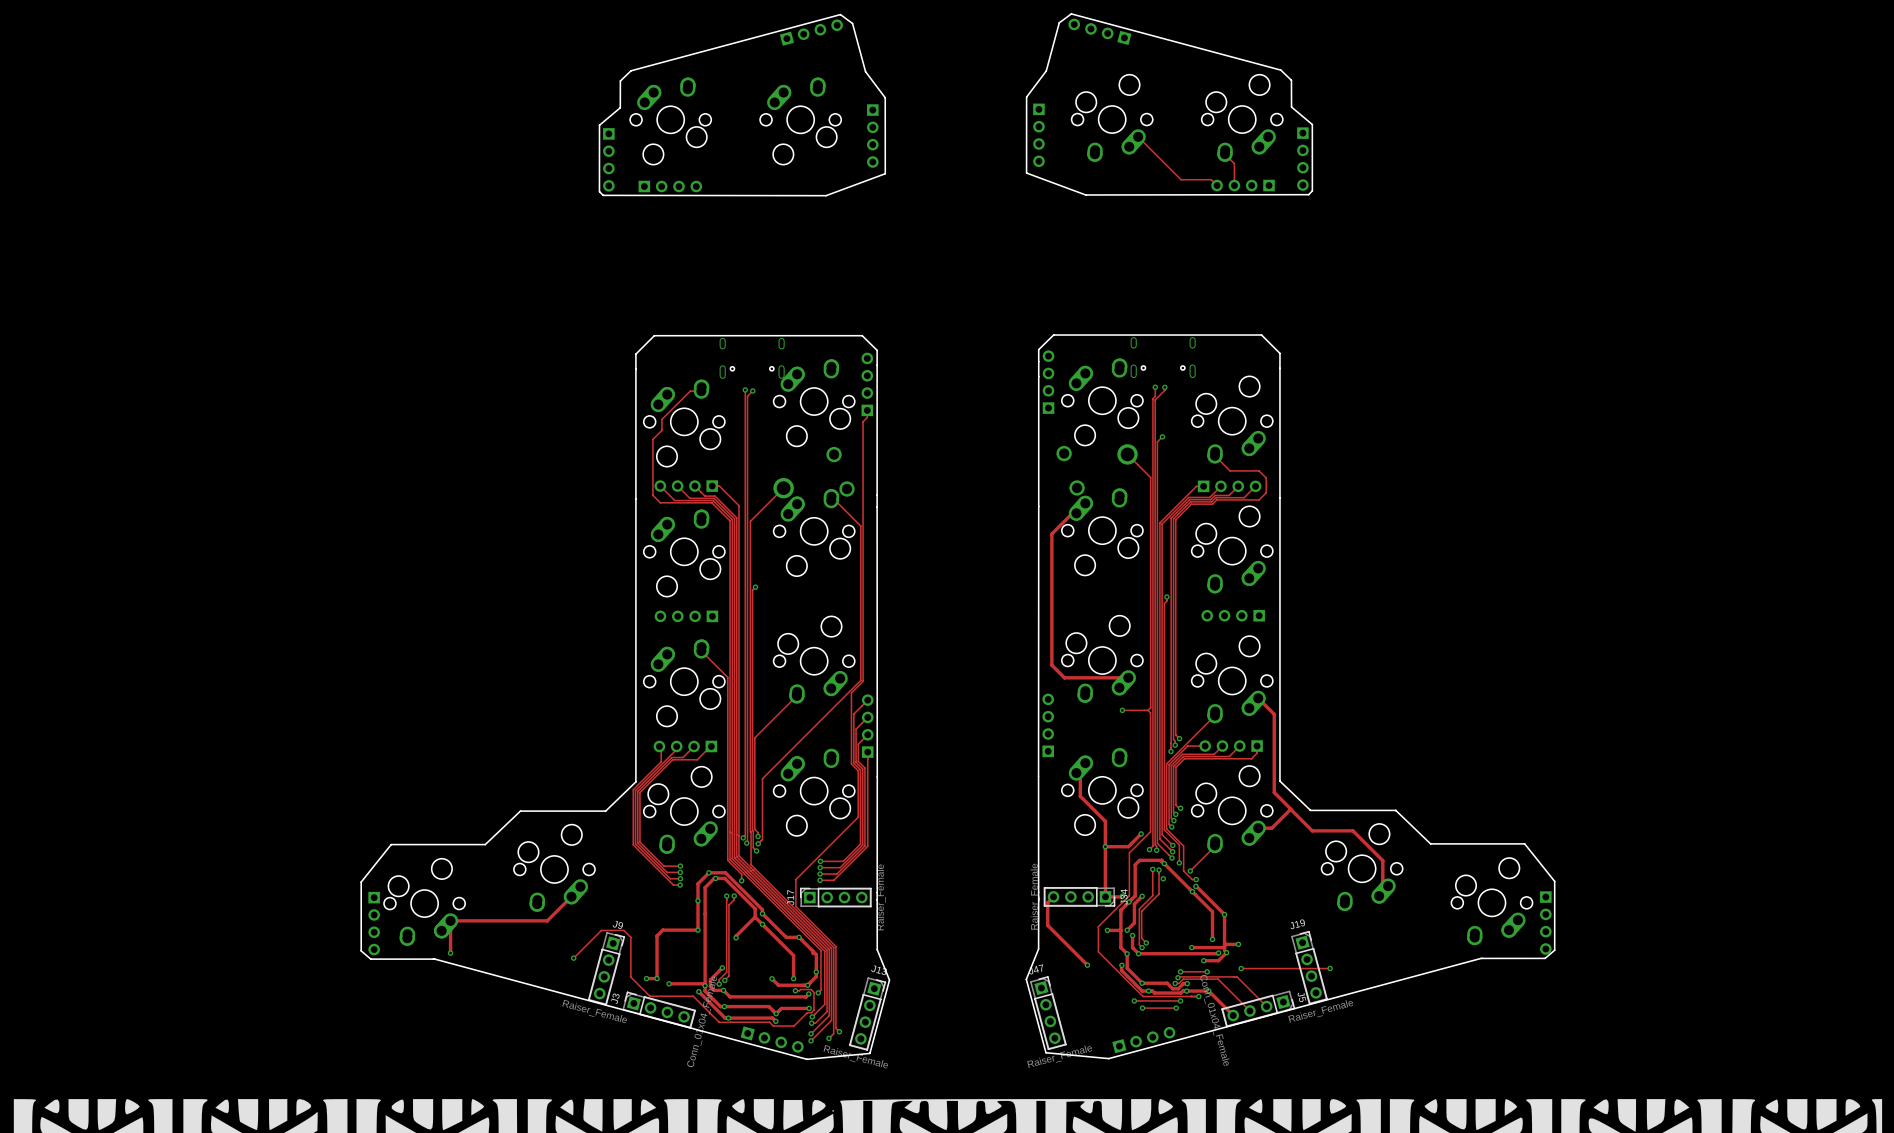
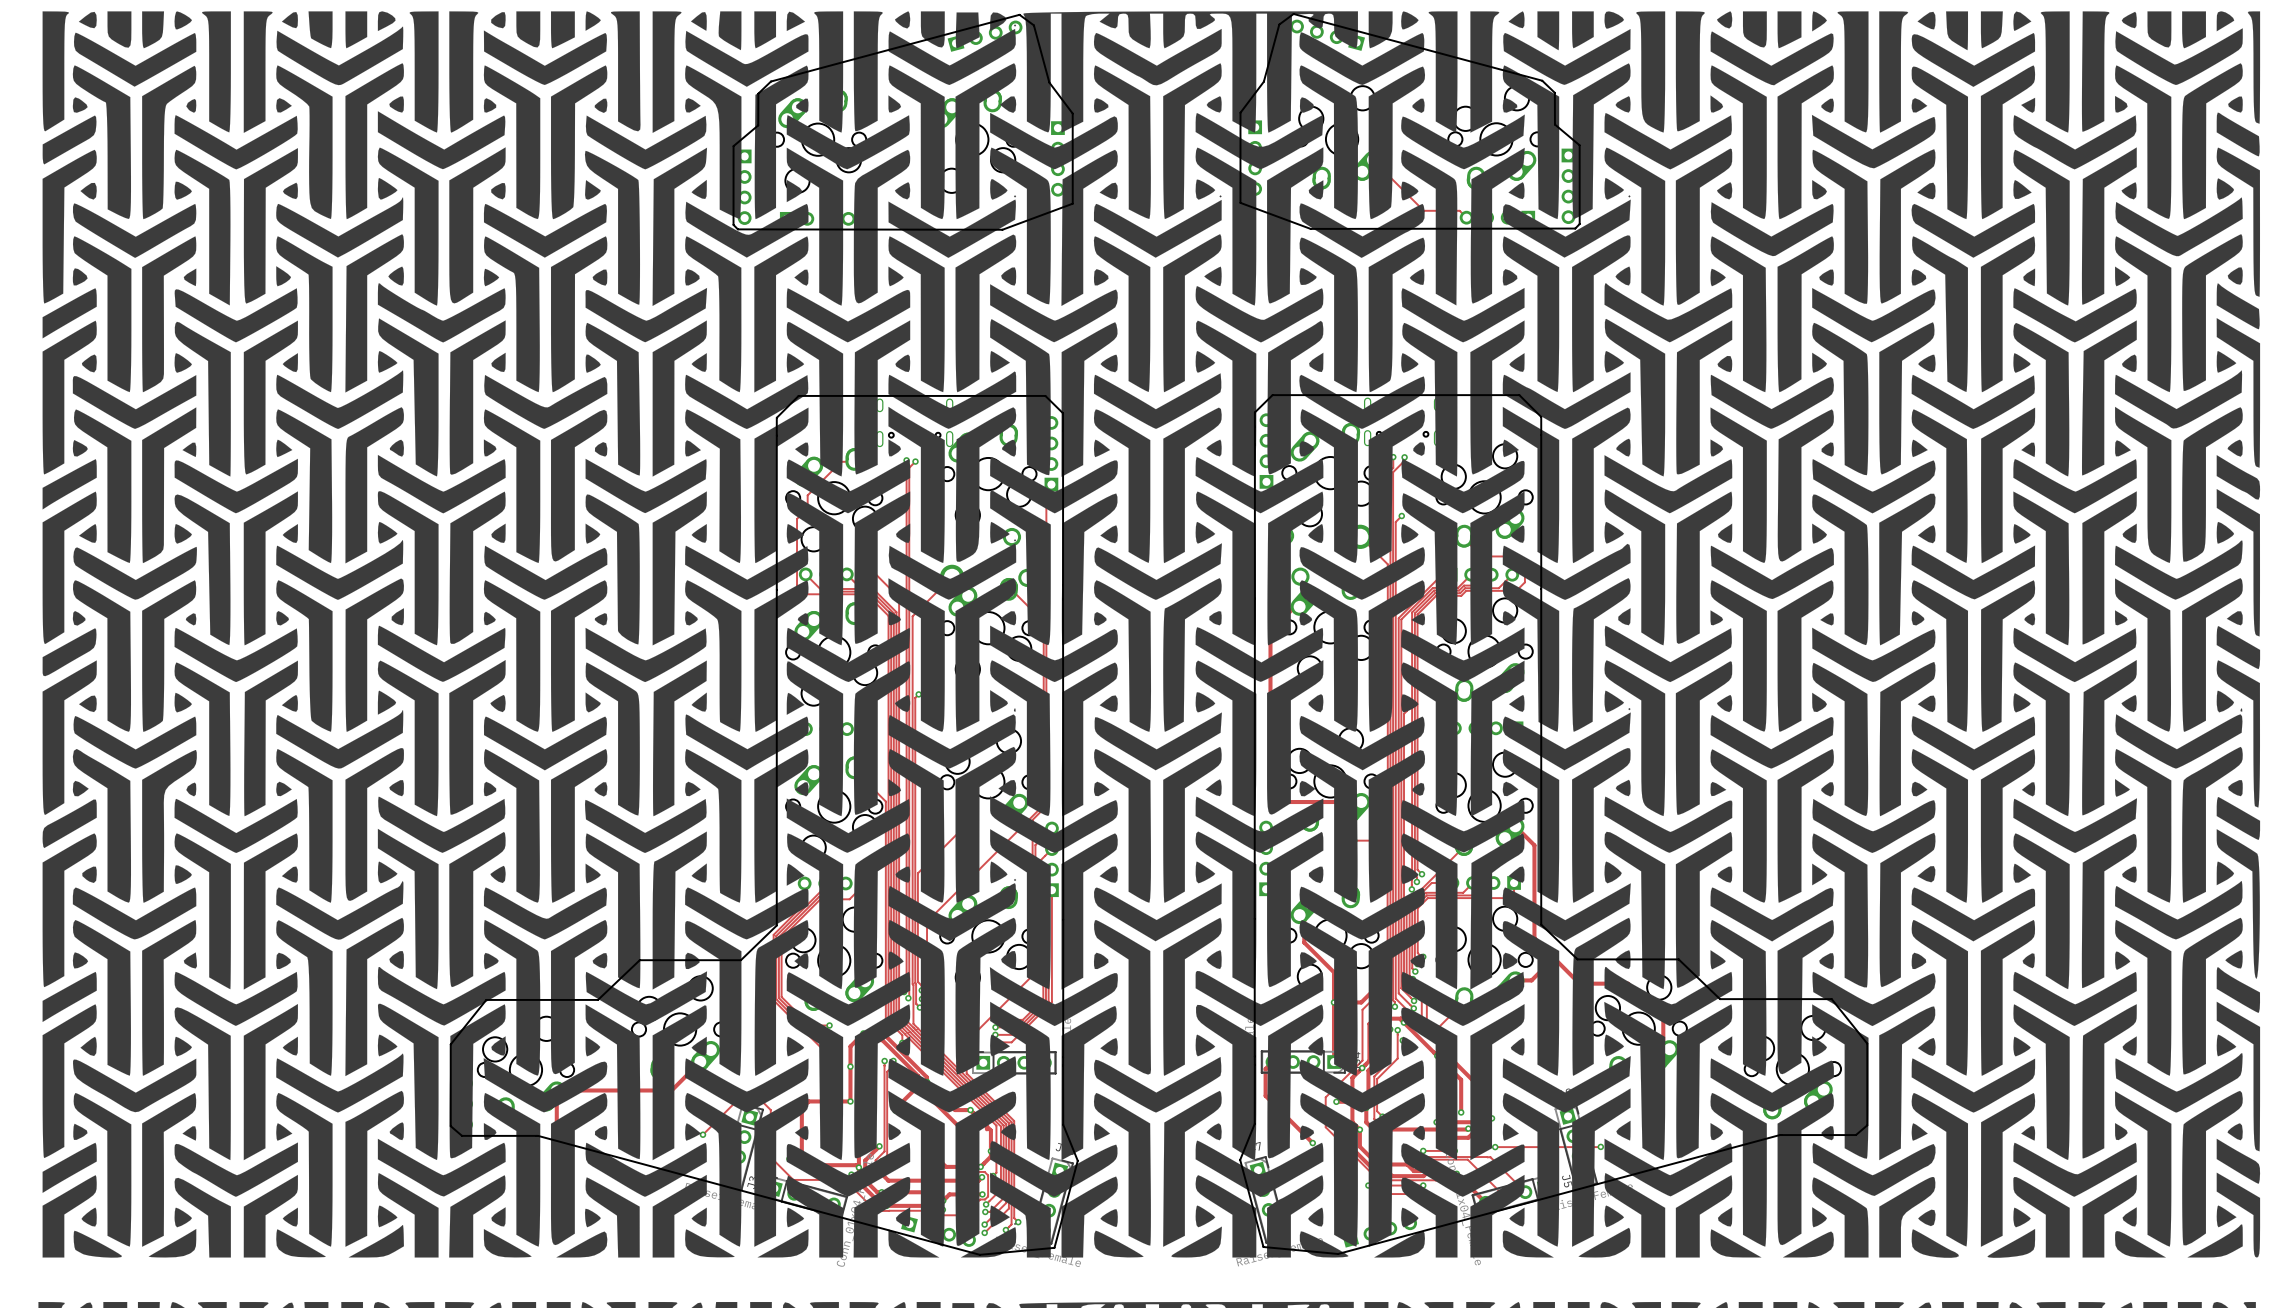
drawing: none -> [42, 11, 2261, 1258]

